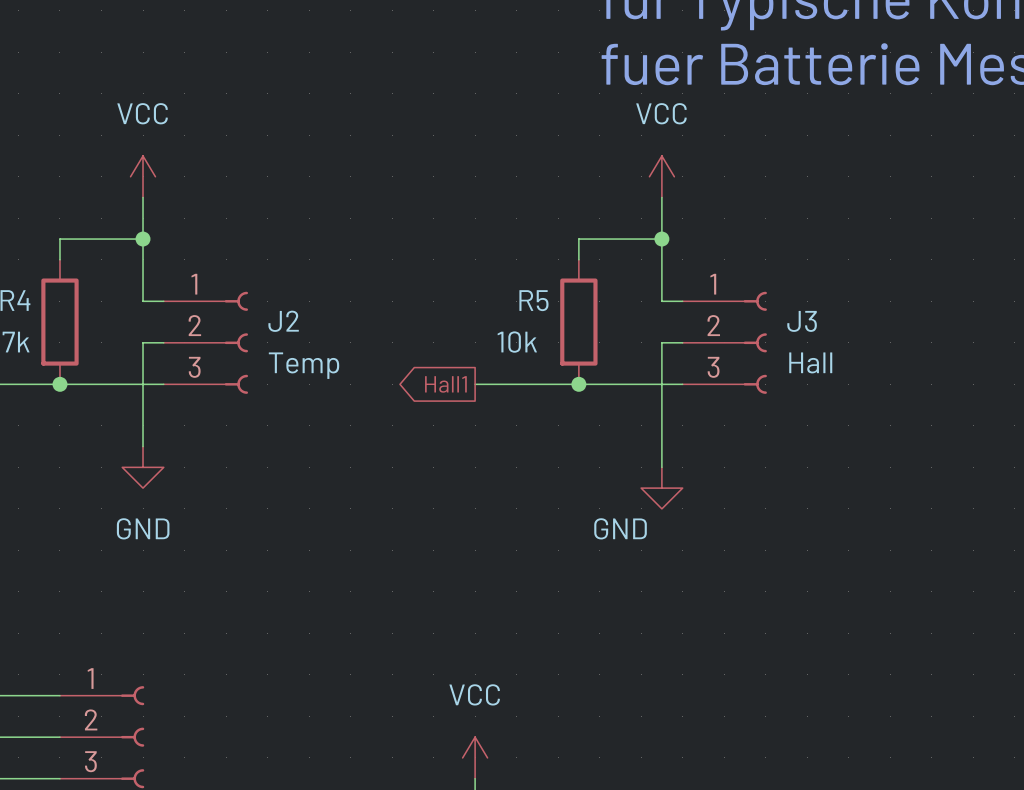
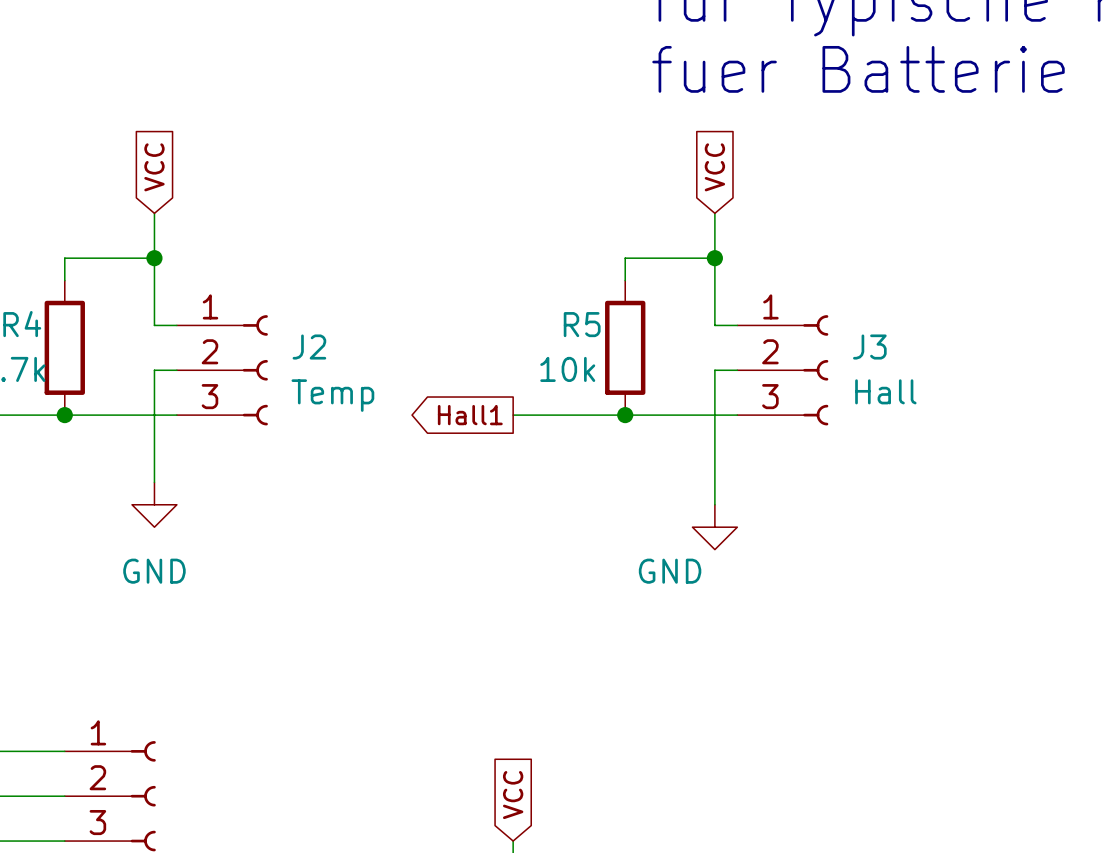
global label: none -> VCC (154, 167)
global label: none -> VCC (714, 167)
power symbol: VCC (143, 176) -> none
power symbol: VCC (661, 176) -> none
global label: none -> VCC (513, 795)
power symbol: VCC (475, 757) -> none

